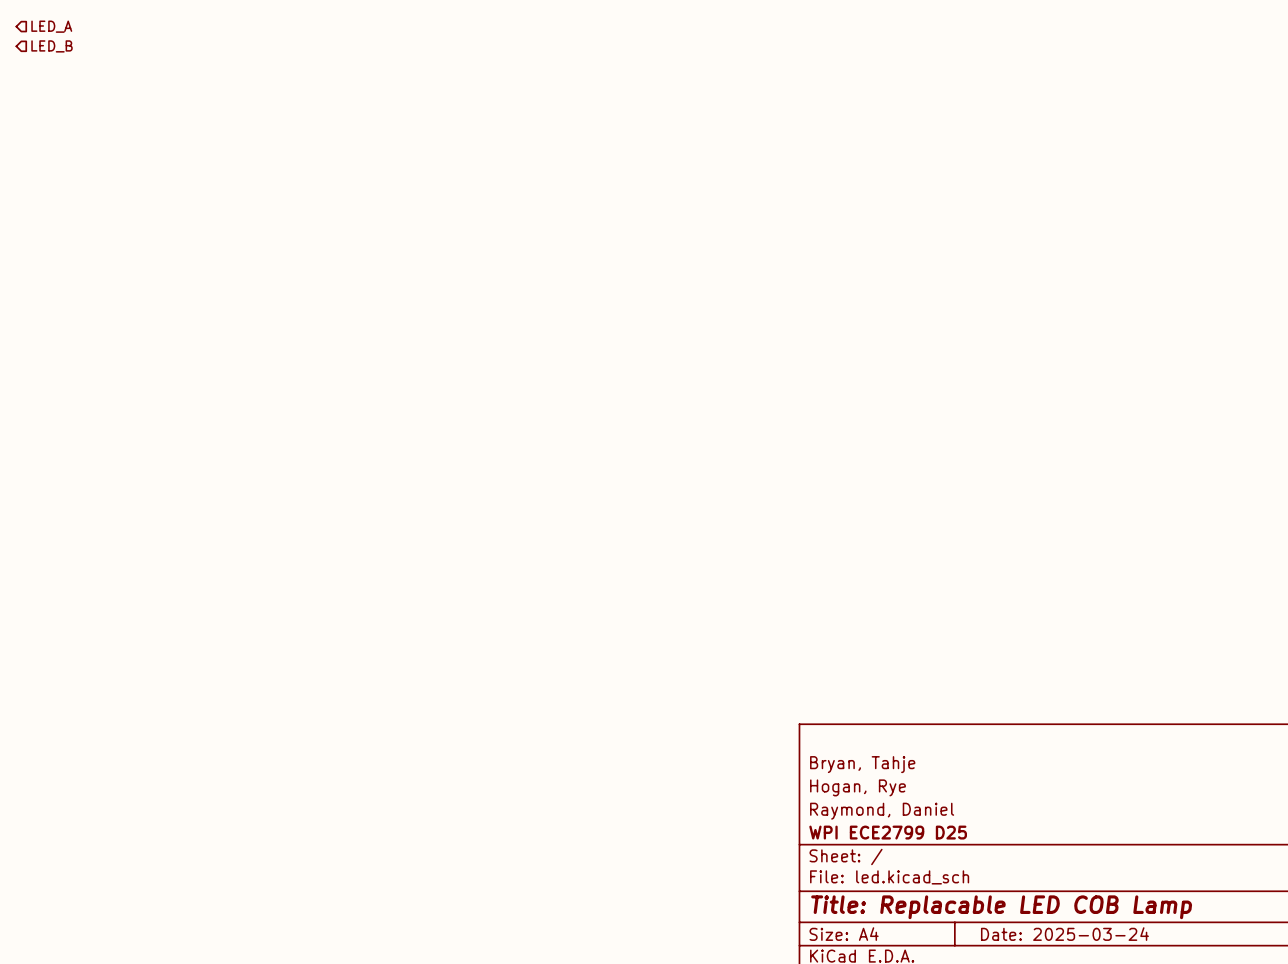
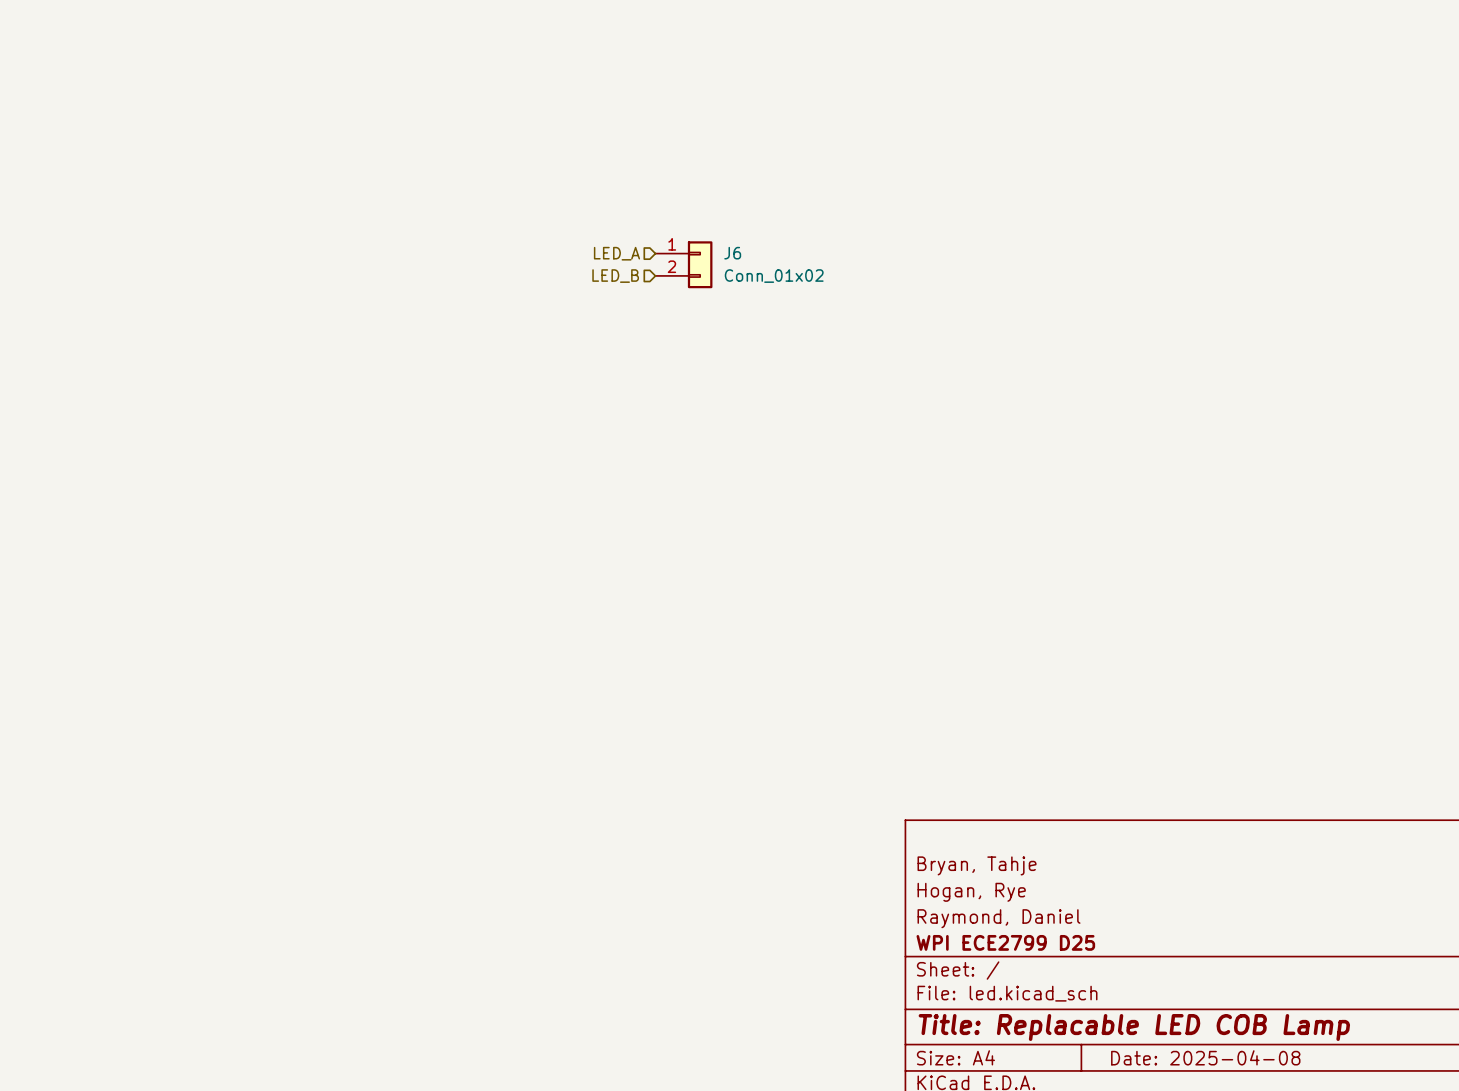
hierarchical label: LED_A (51, 26) -> none
hierarchical label: LED_B (52, 46) -> none
hierarchical label: none -> LED_A (616, 253)
J6: none -> Conn_01x02 (683, 264)
hierarchical label: none -> LED_B (615, 276)
title block: Date: 2025-03-24 (1064, 934) -> Date: 2025-04-08 (1205, 1057)

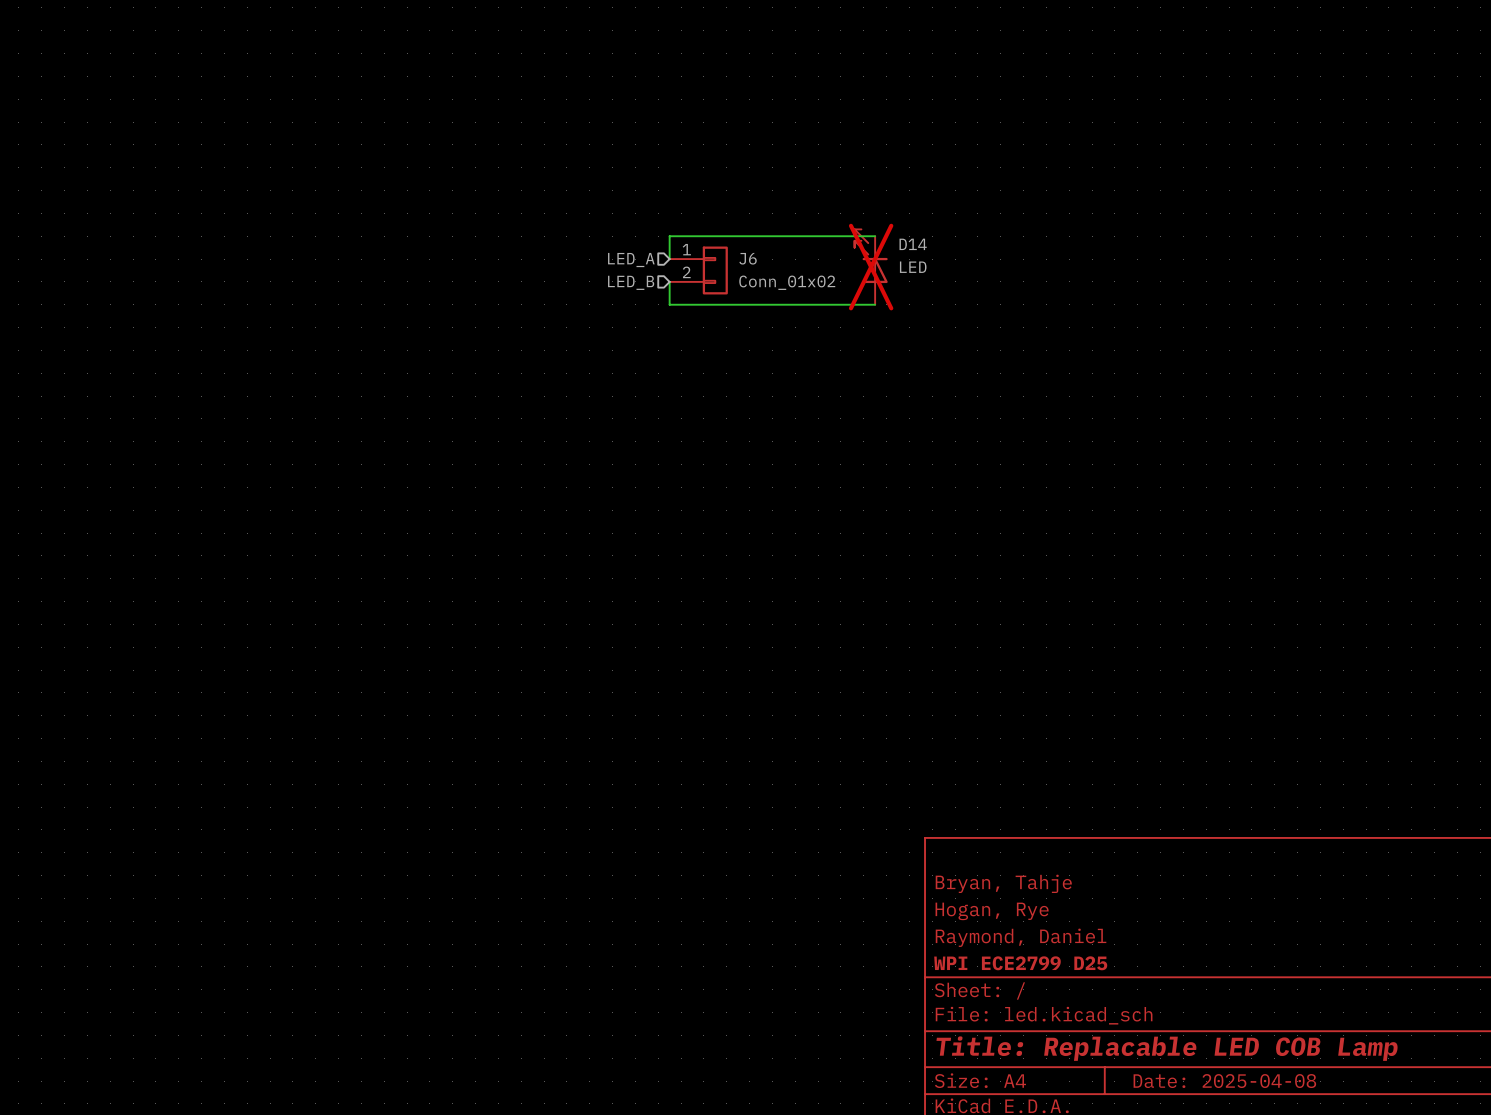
wire: none -> (875, 236) (669, 236) (669, 259)
D14: none -> LED (871, 267)
wire: none -> (669, 281) (669, 304) (875, 304)

